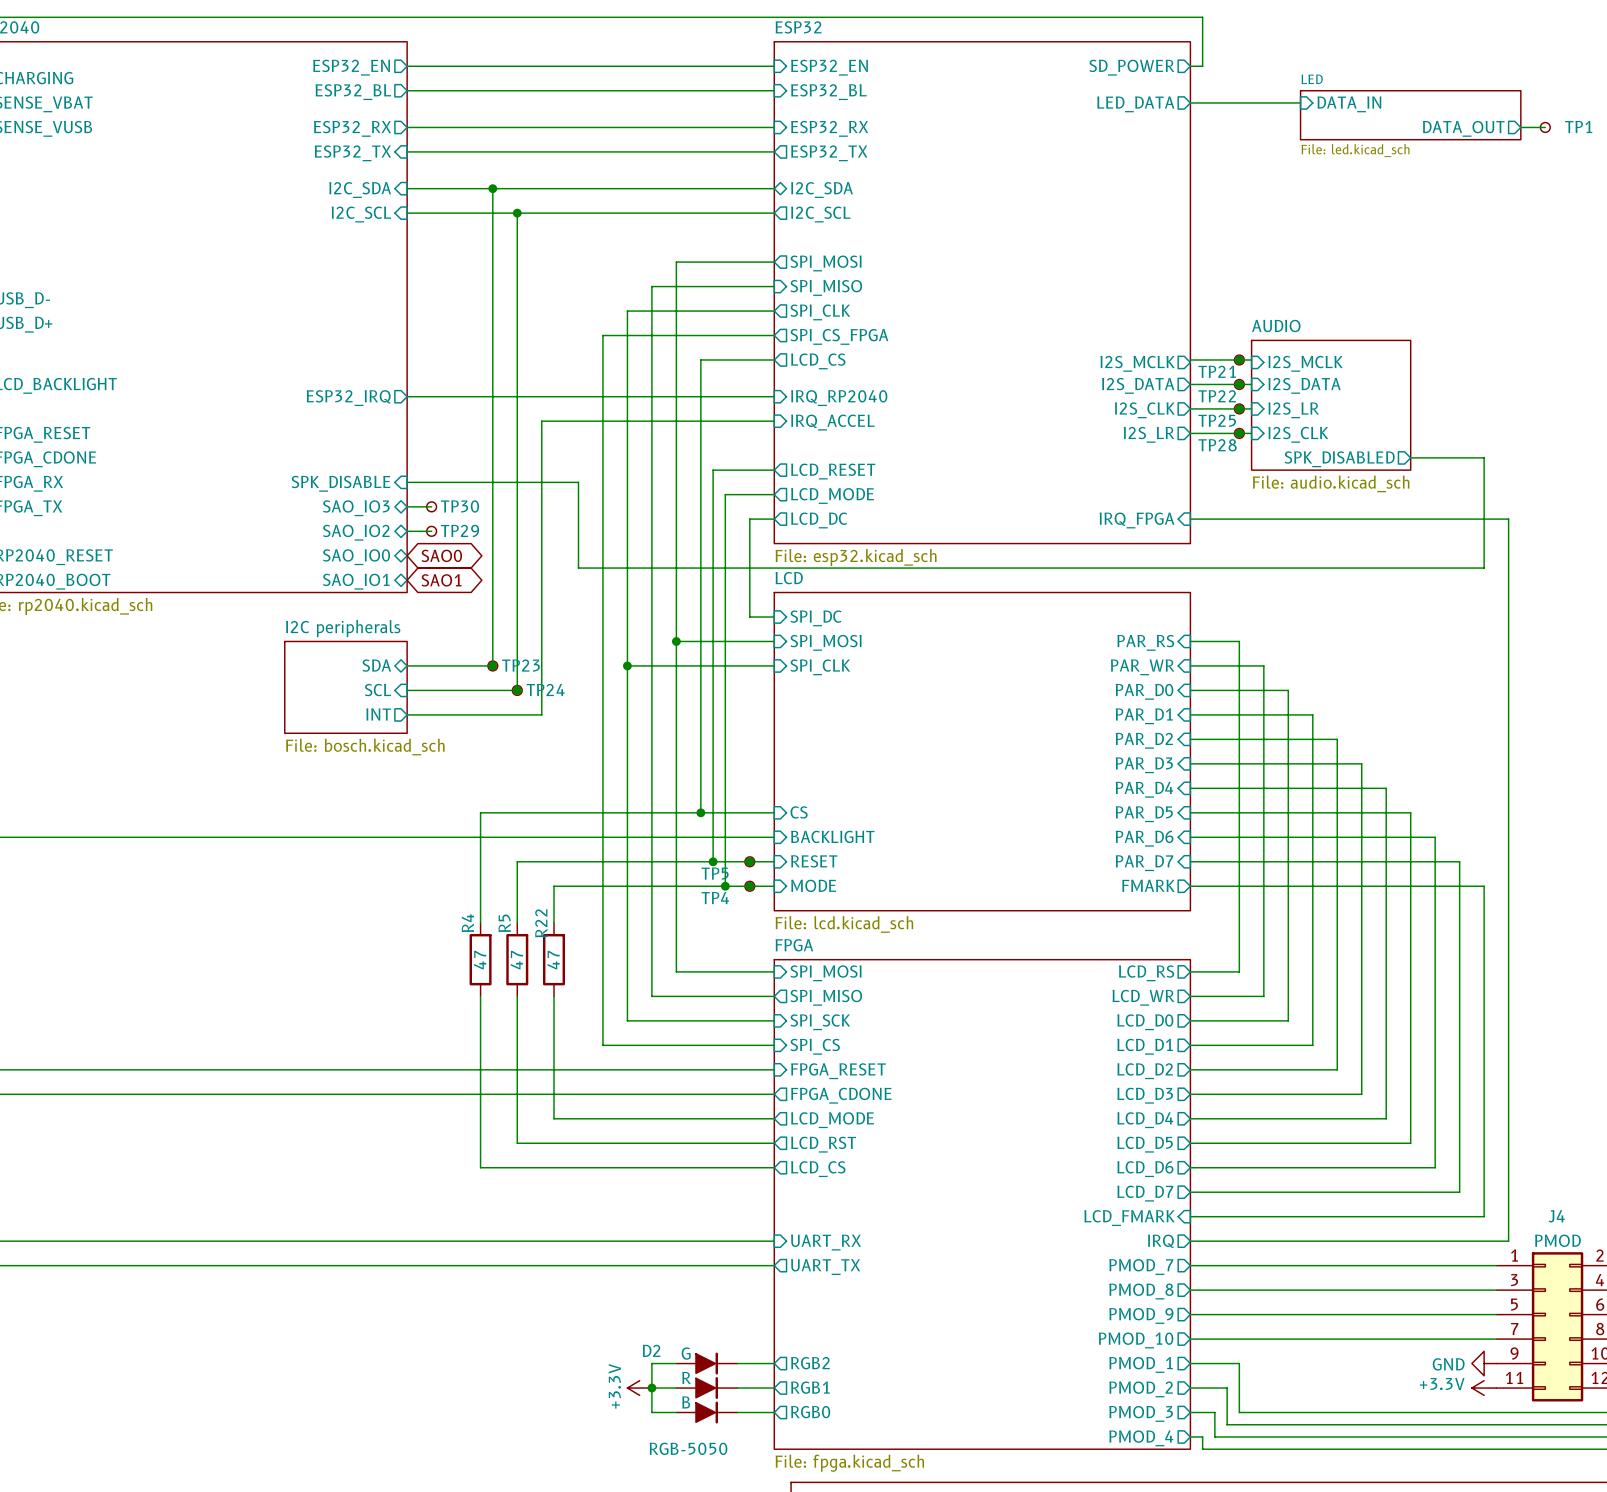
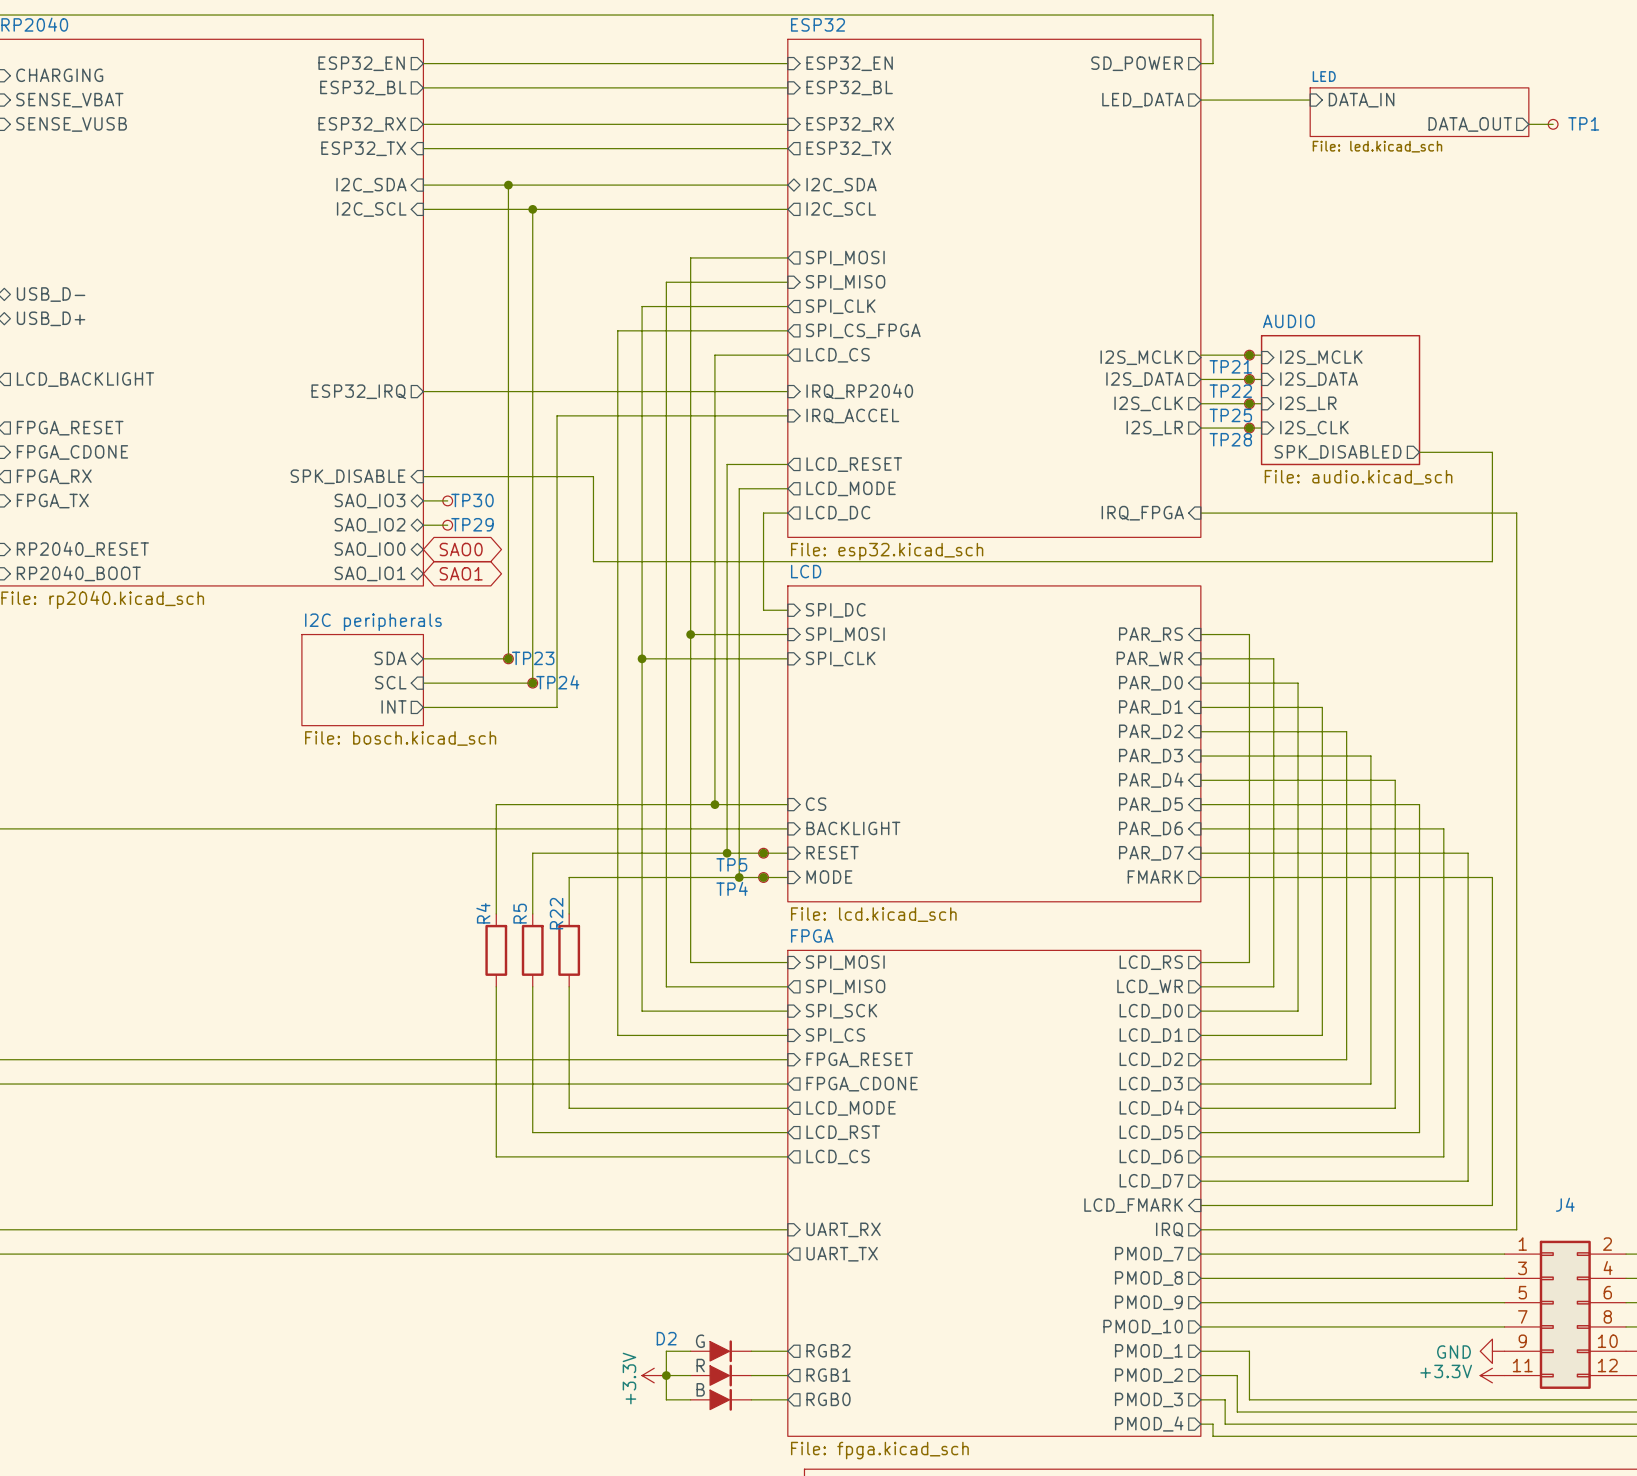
R4 value: 47 (480, 960) -> none
R5 value: 47 (516, 960) -> none
R22 value: 47 (553, 960) -> none
J4 value: PMOD (1557, 1240) -> none
D2 value: RGB-5050 (688, 1448) -> none

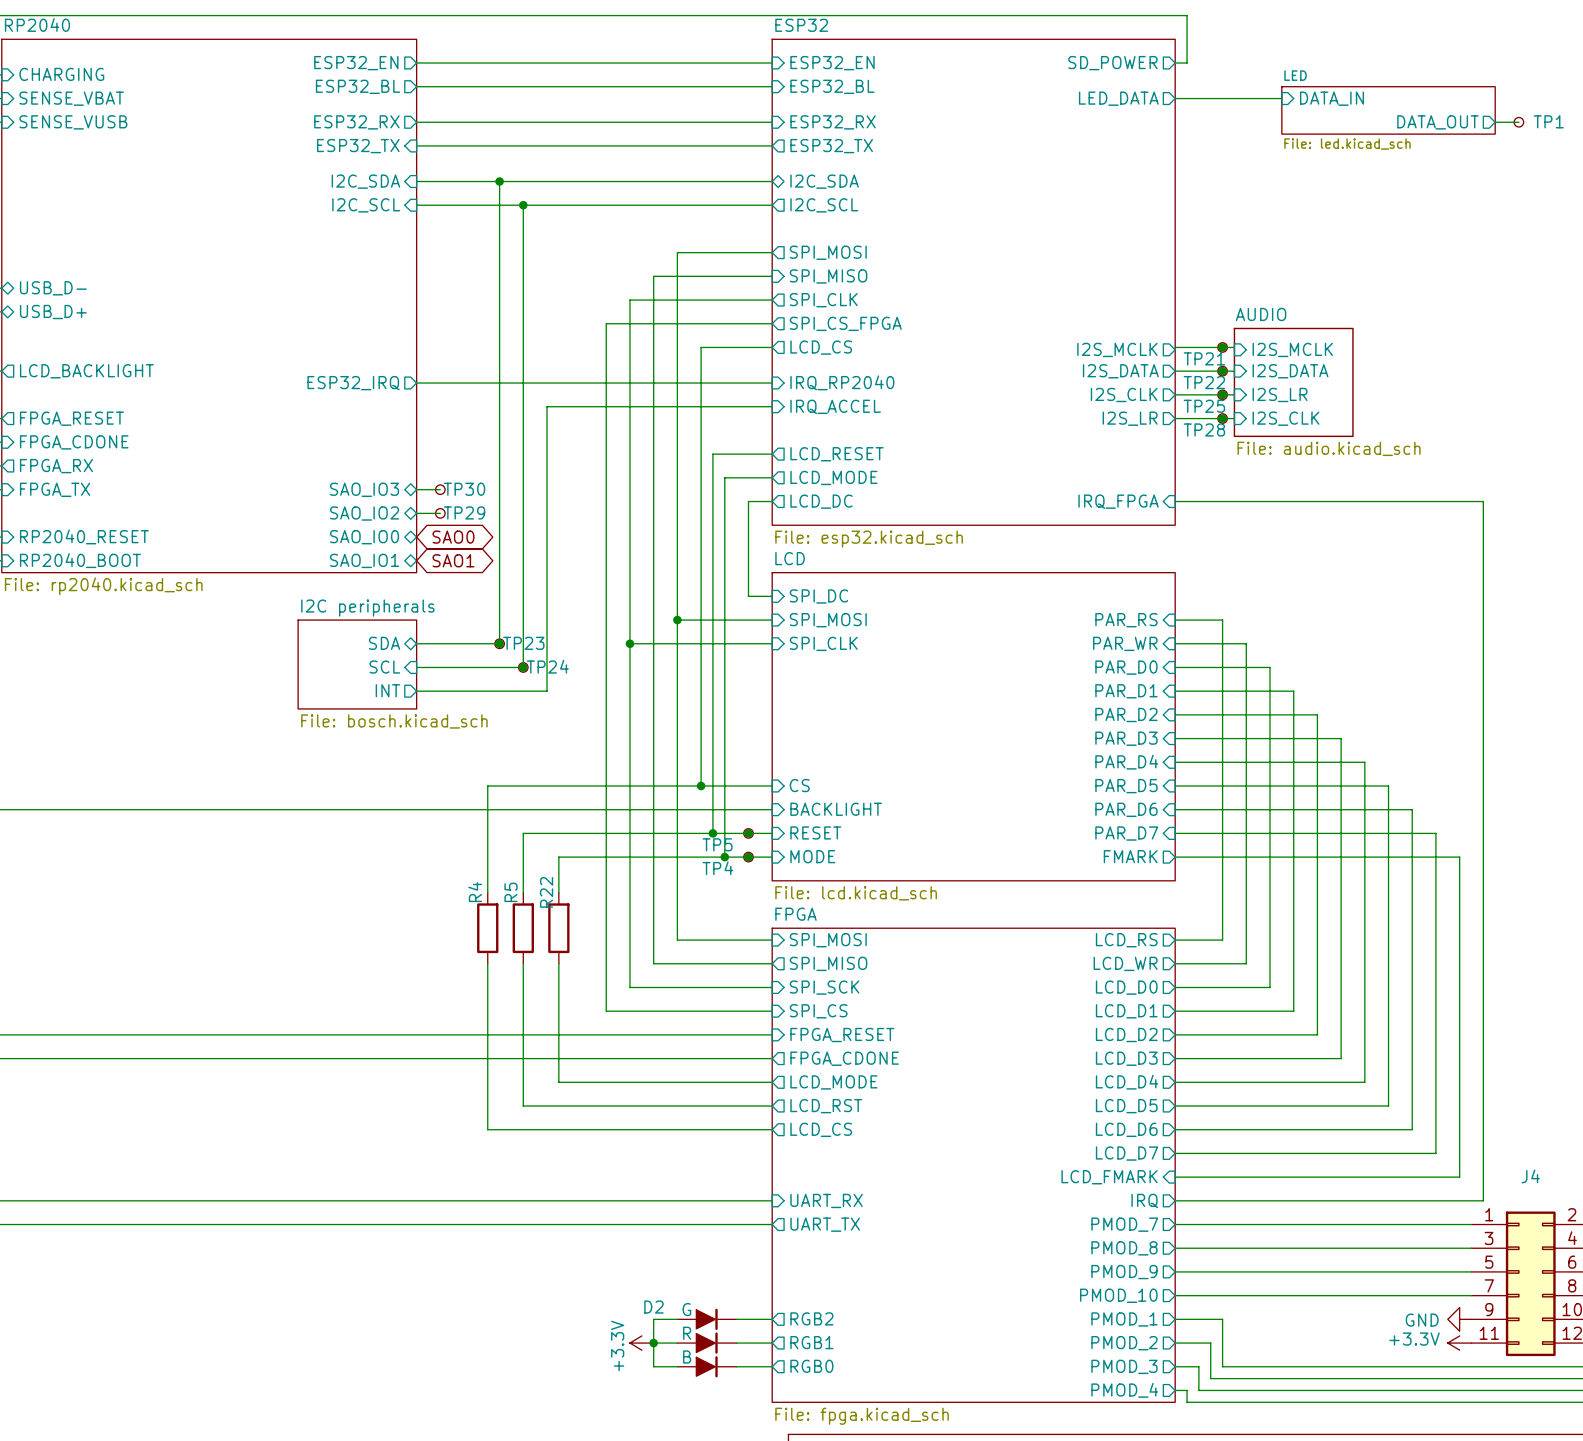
sheet AUDIO: none -> File: audio.kicad_sch (1293, 382)
sheet AUDIO: File: audio.kicad_sch (1340, 400) -> none
sheet pin: SPK_DISABLED (1338, 452) -> none
wire: (1419, 452) (1492, 452) (1492, 561) (593, 561) (593, 476) (423, 476) -> none
sheet pin: SPK_DISABLE (348, 476) -> none

